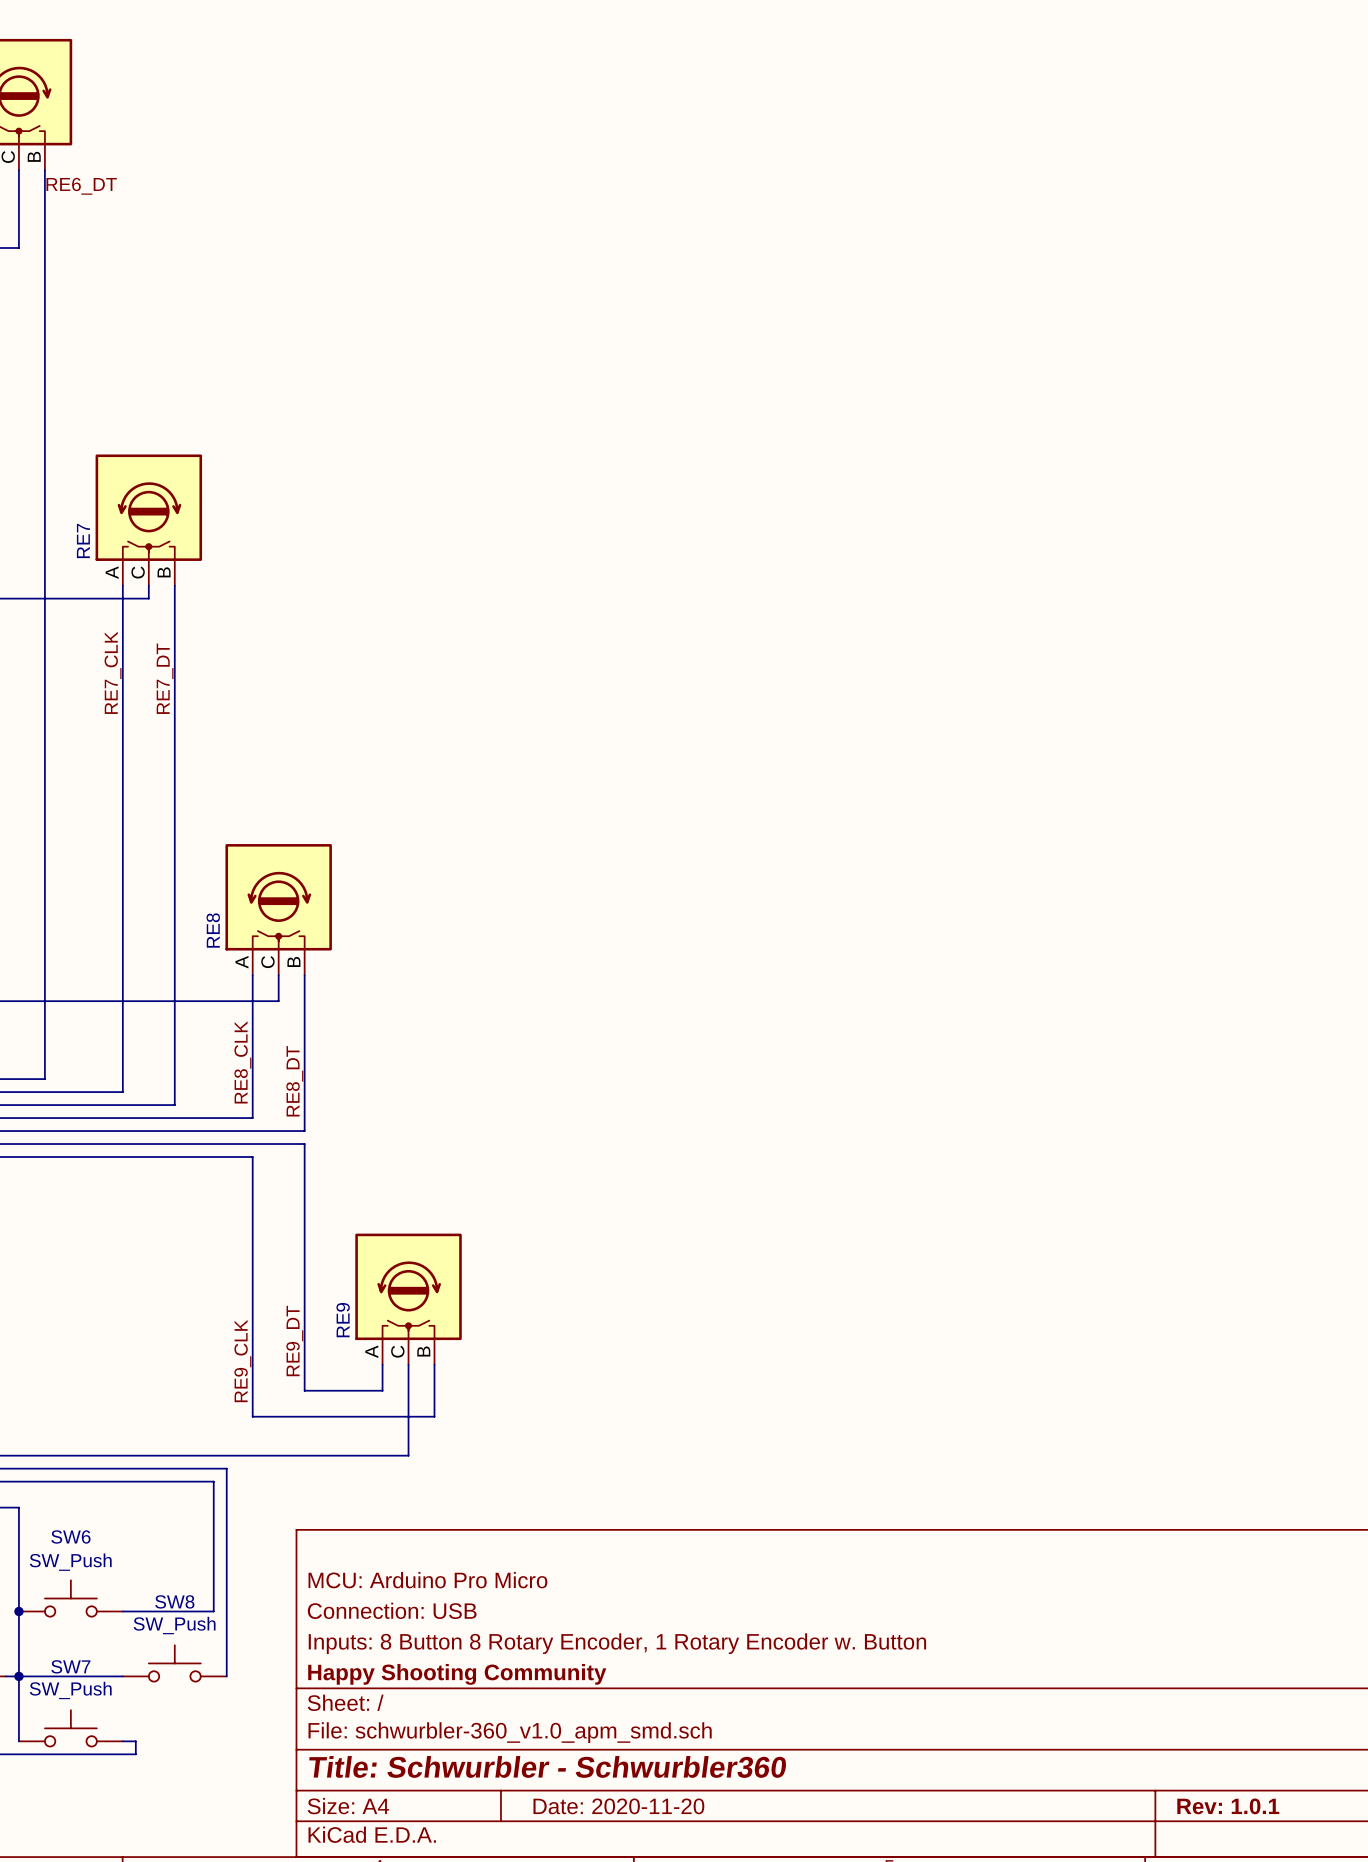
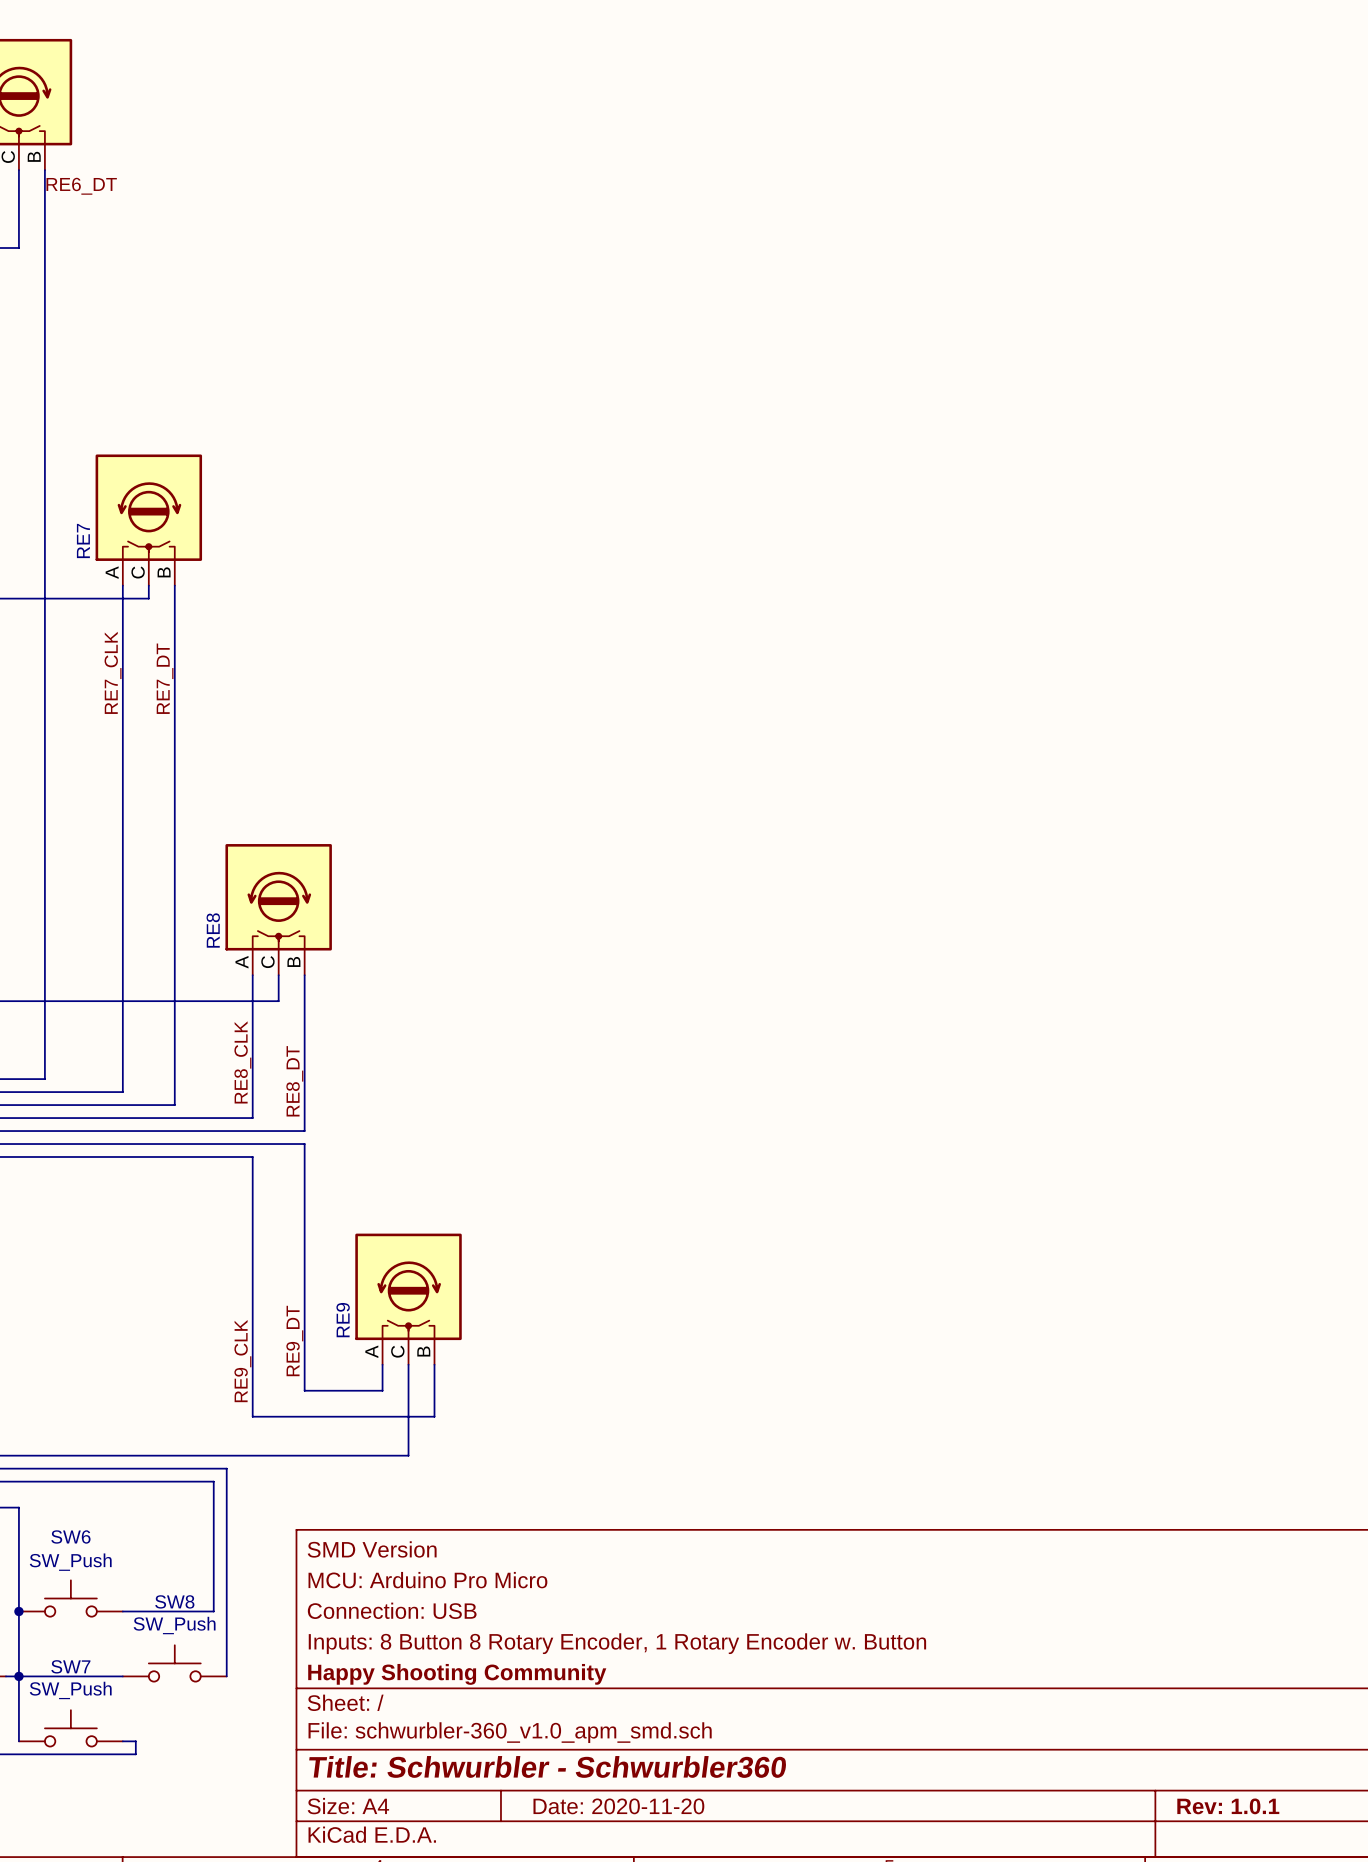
title block: none -> SMD Version (372, 1549)

